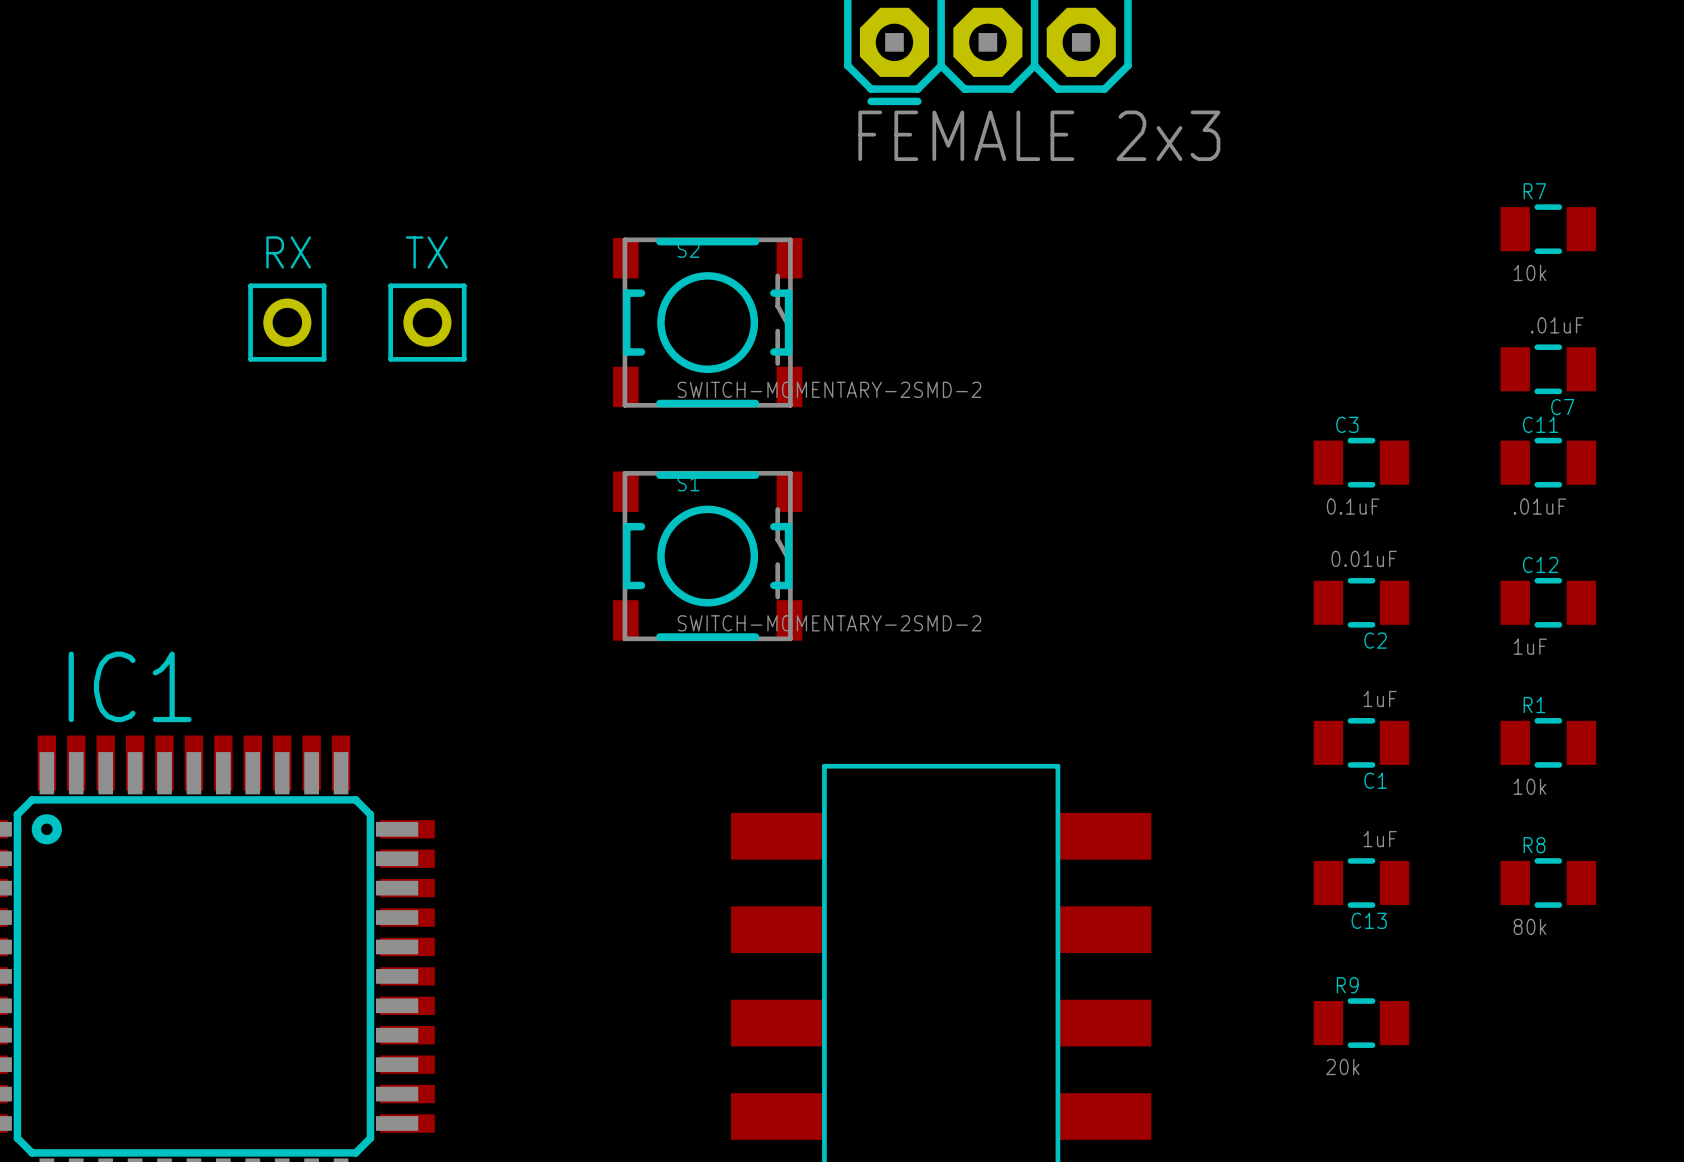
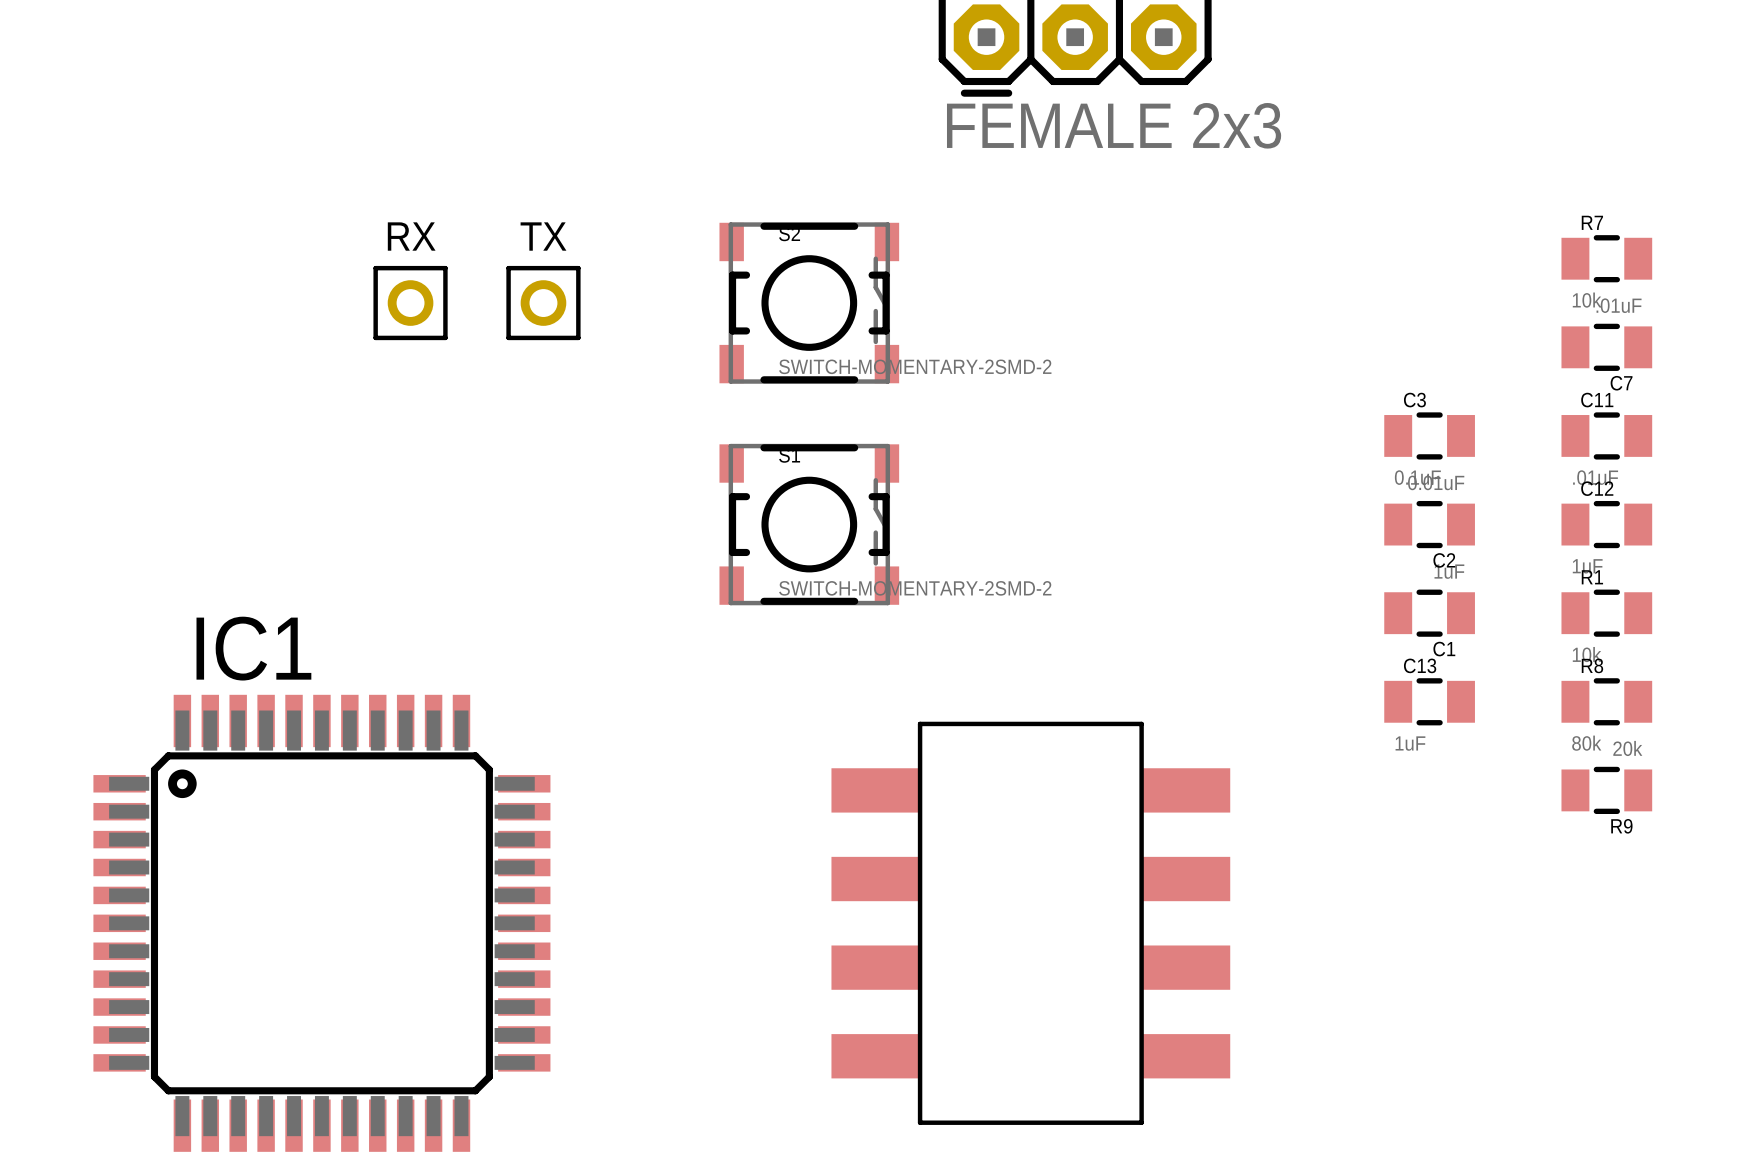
R7 position: (1548, 229) -> (1606, 258)
C2 position: (1361, 602) -> (1429, 524)
C12 position: (1548, 602) -> (1606, 524)
C1: none -> 1uF (1429, 613)
R1: none -> 10k (1606, 613)
C1 value position: 1uF (1380, 698) -> 1uF (1410, 743)
R1 name: R1 (1534, 705) -> R8 (1592, 665)
C1 name: C1 (1375, 780) -> C13 (1420, 665)
R1 value: 10k (1529, 786) -> 80k (1586, 743)
C13: 1uF (1361, 882) -> none
R8: 80k (1548, 882) -> none
R9 name position: R9 (1347, 985) -> R9 (1621, 826)
R9 position: (1361, 1023) -> (1606, 790)
R9 value position: 20k (1342, 1067) -> 20k (1627, 748)

